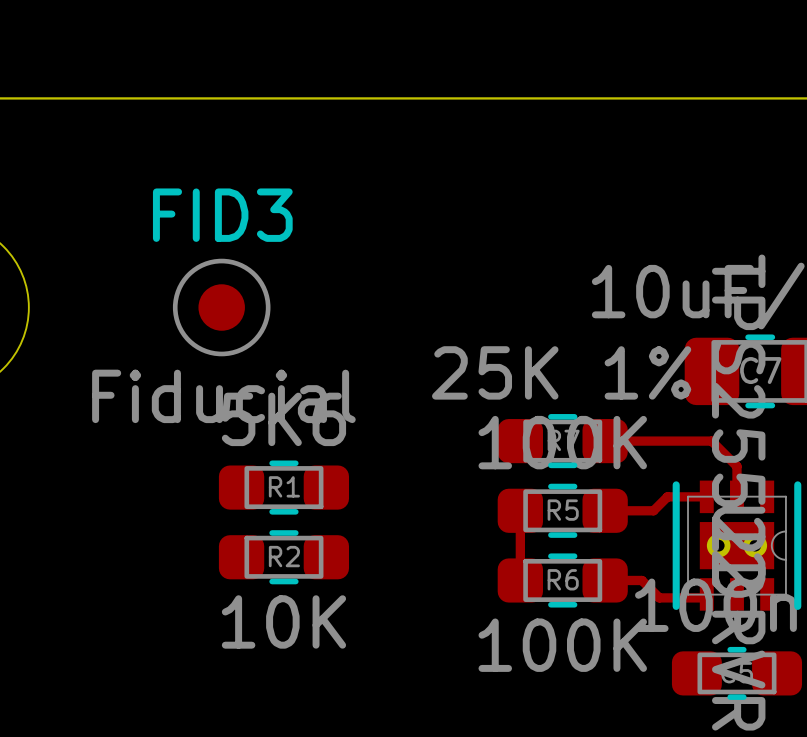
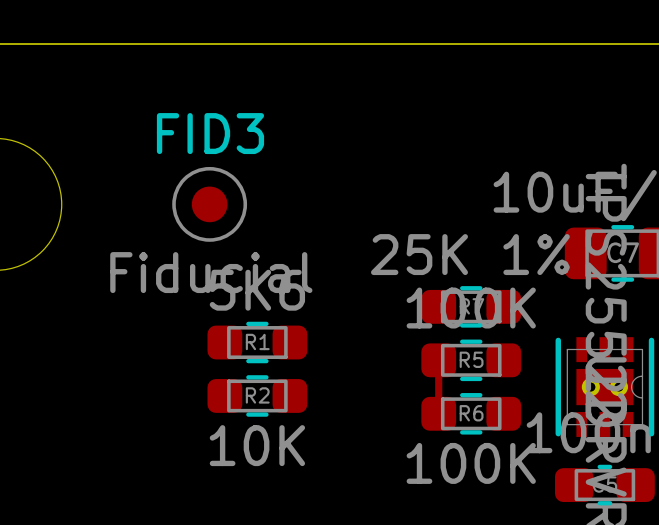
track: (605, 441) (711, 441) (736, 466) (736, 496) -> none
track: (706, 496) (667, 496) (653, 510) (605, 510) -> none
track: (605, 580) (641, 580) (659, 597) (705, 597) -> none

